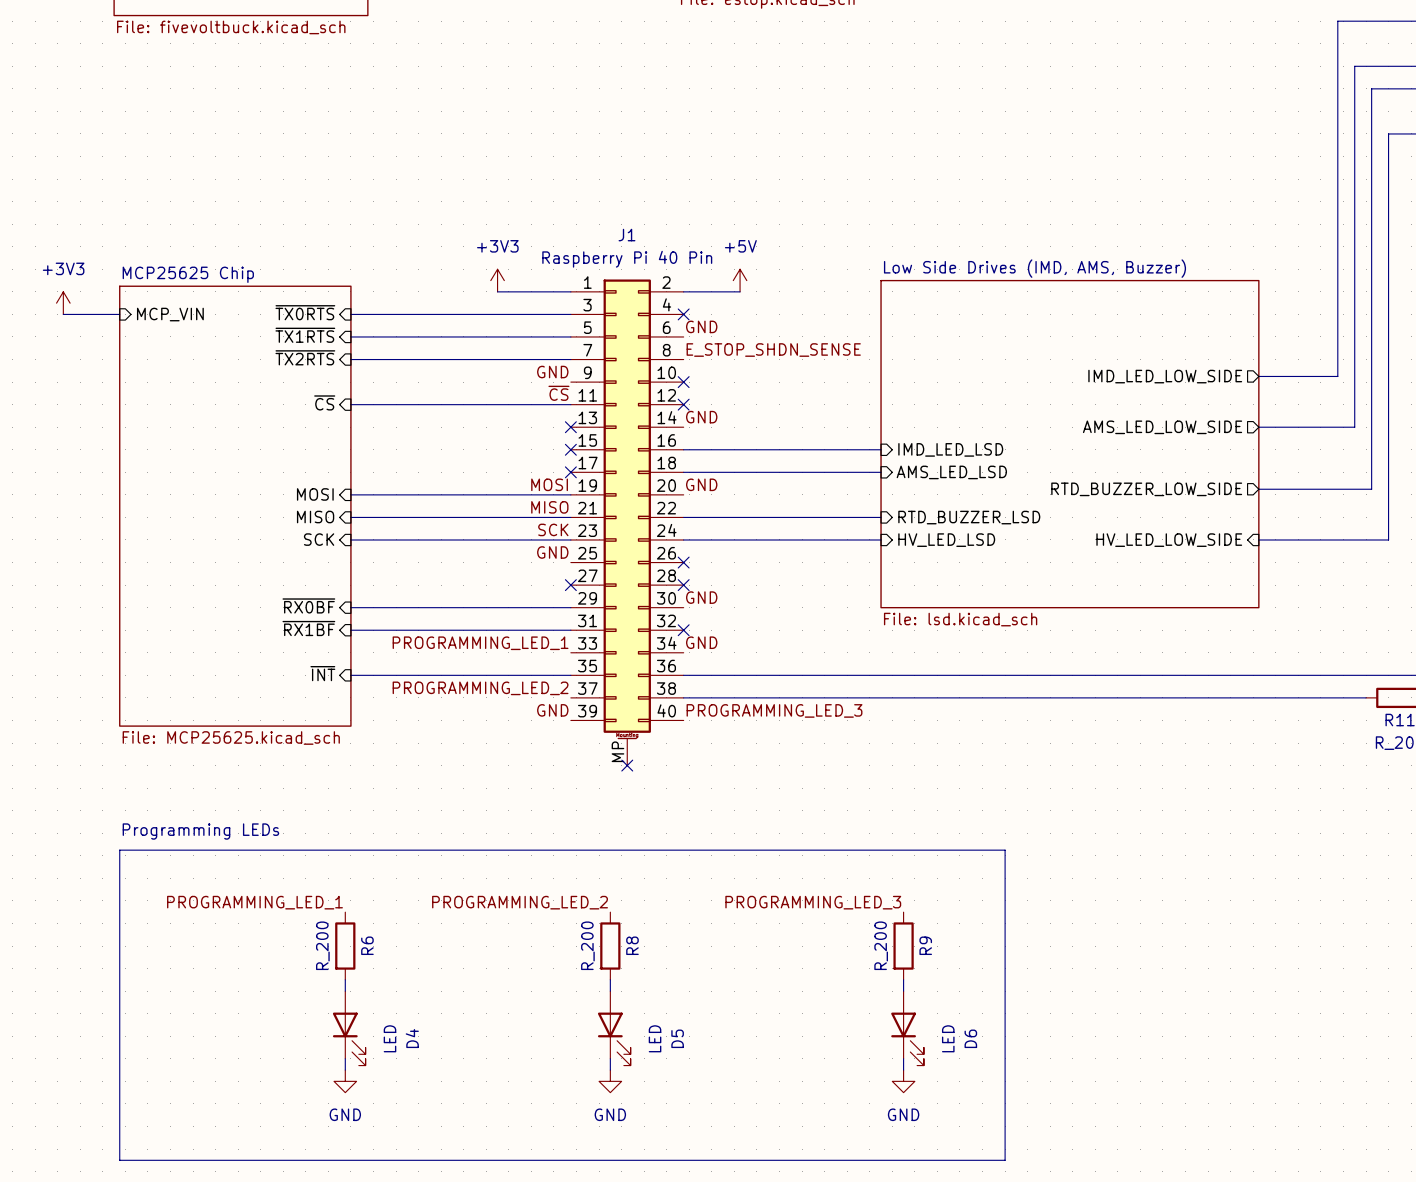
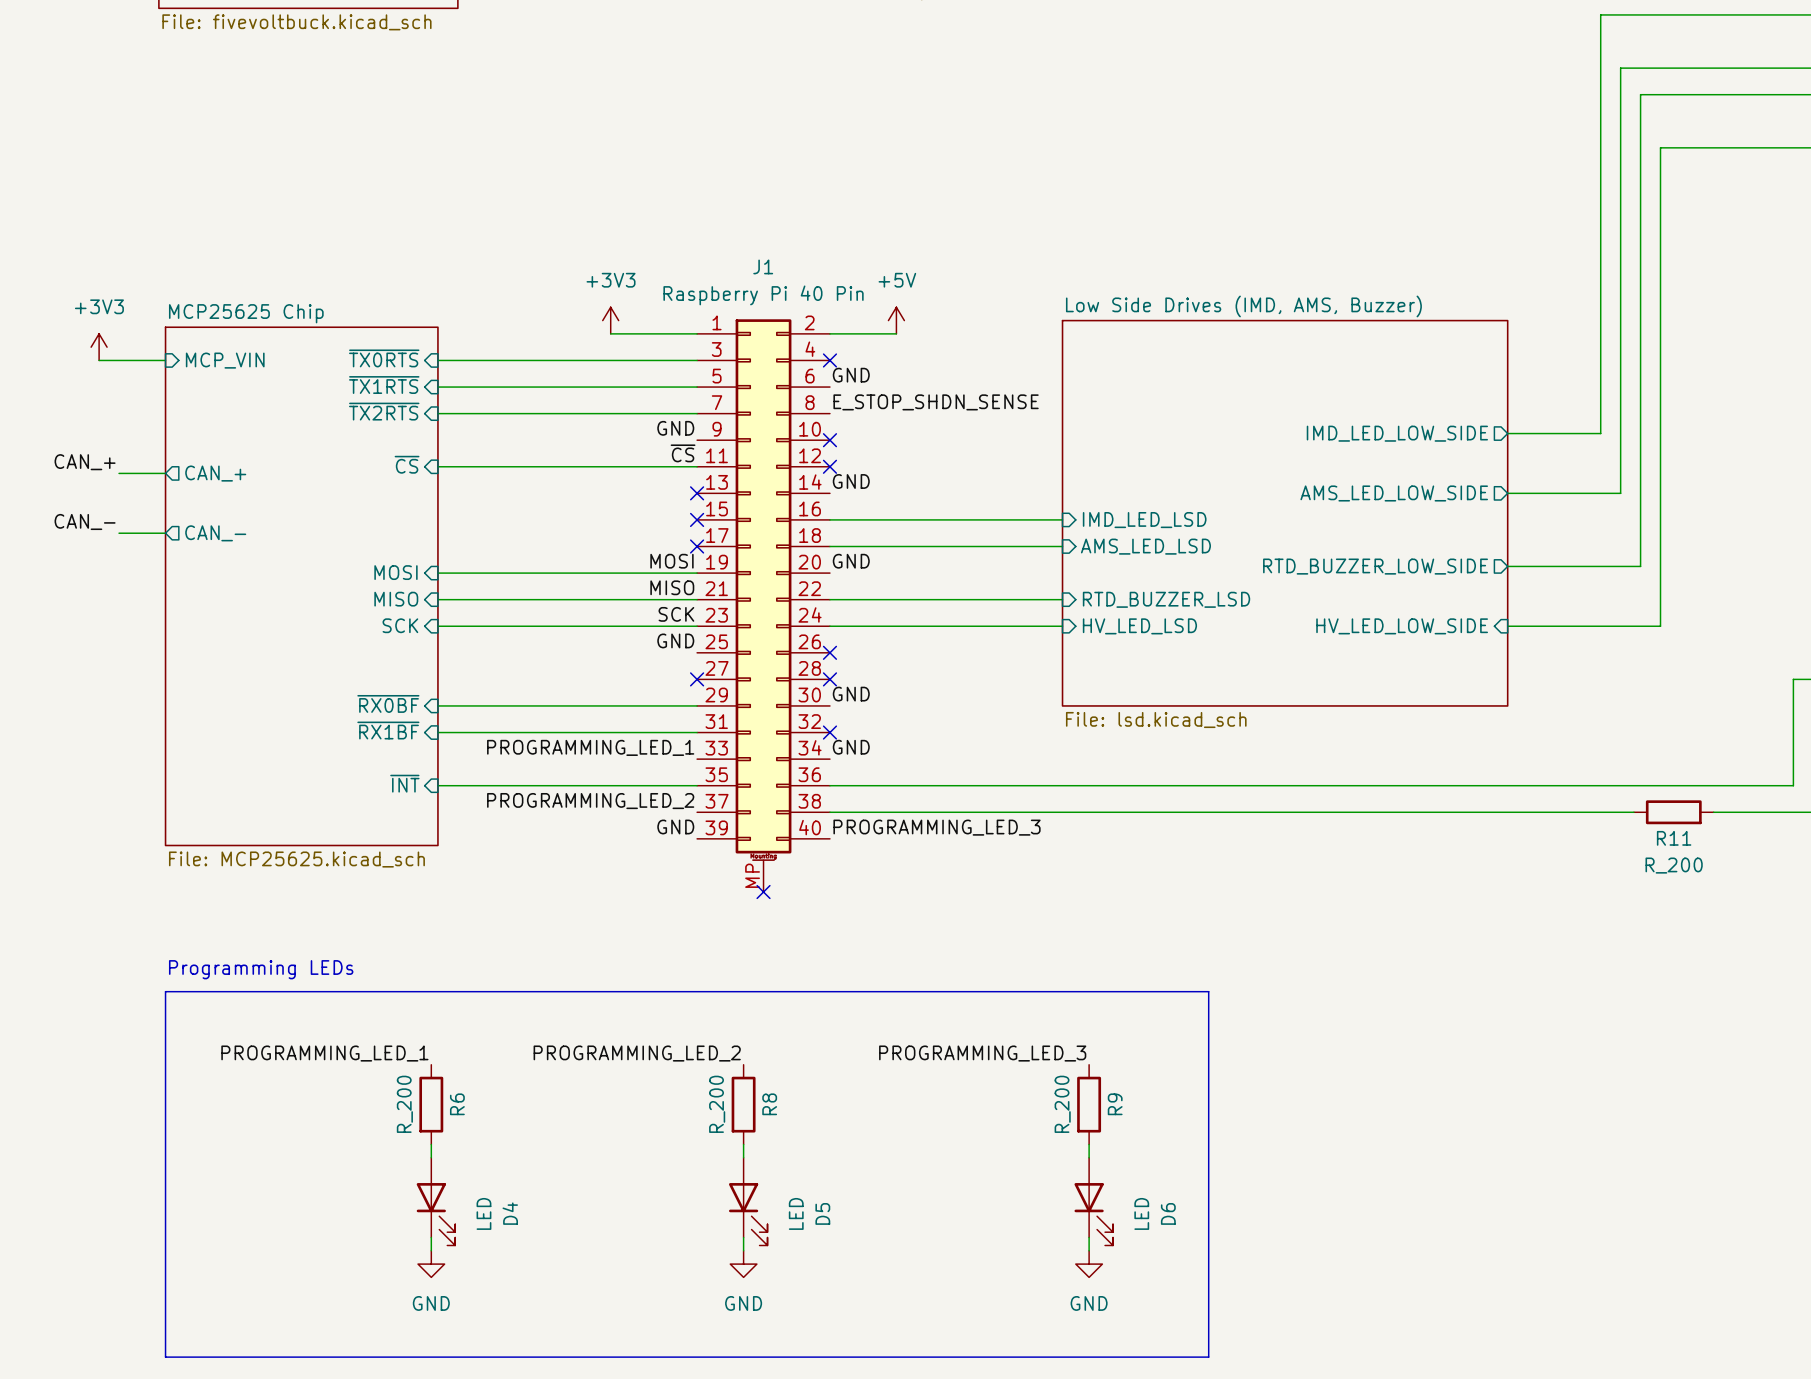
label: none -> CAN_+ (85, 462)
wire: none -> (119, 473) (165, 473)
sheet pin: none -> CAN_+ (215, 473)
label: none -> CAN_- (85, 521)
wire: none -> (119, 533) (165, 533)
sheet pin: none -> CAN_- (215, 533)

